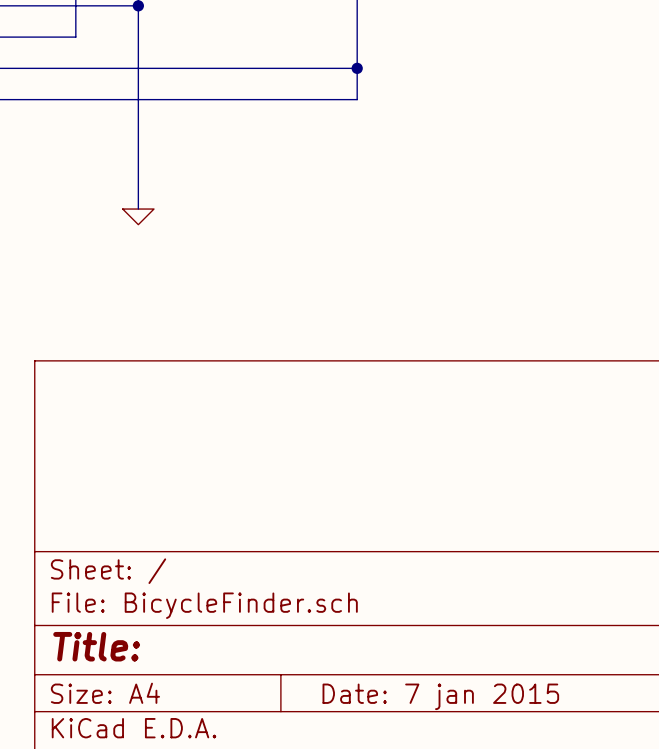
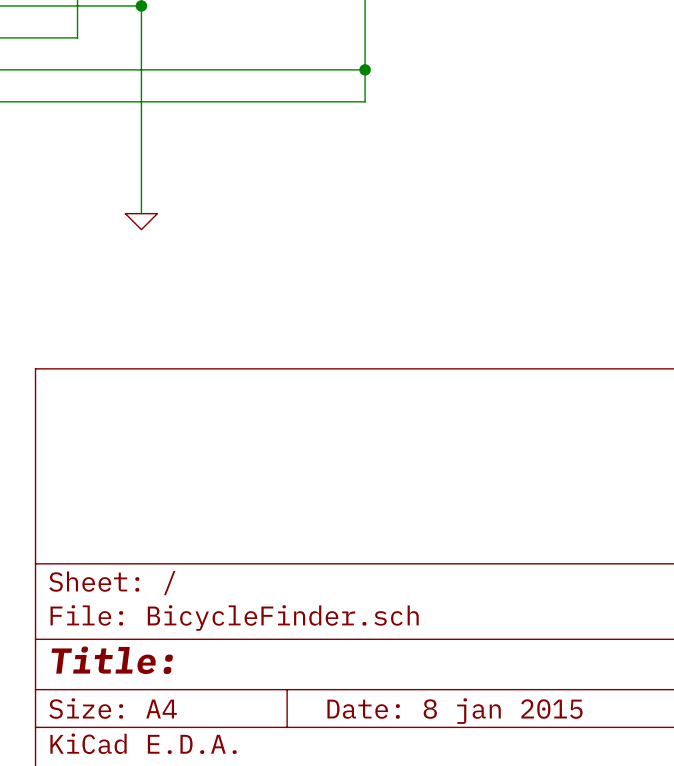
title block: Date: 7 jan 2015 (440, 696) -> Date: 8 jan 2015 (455, 711)

